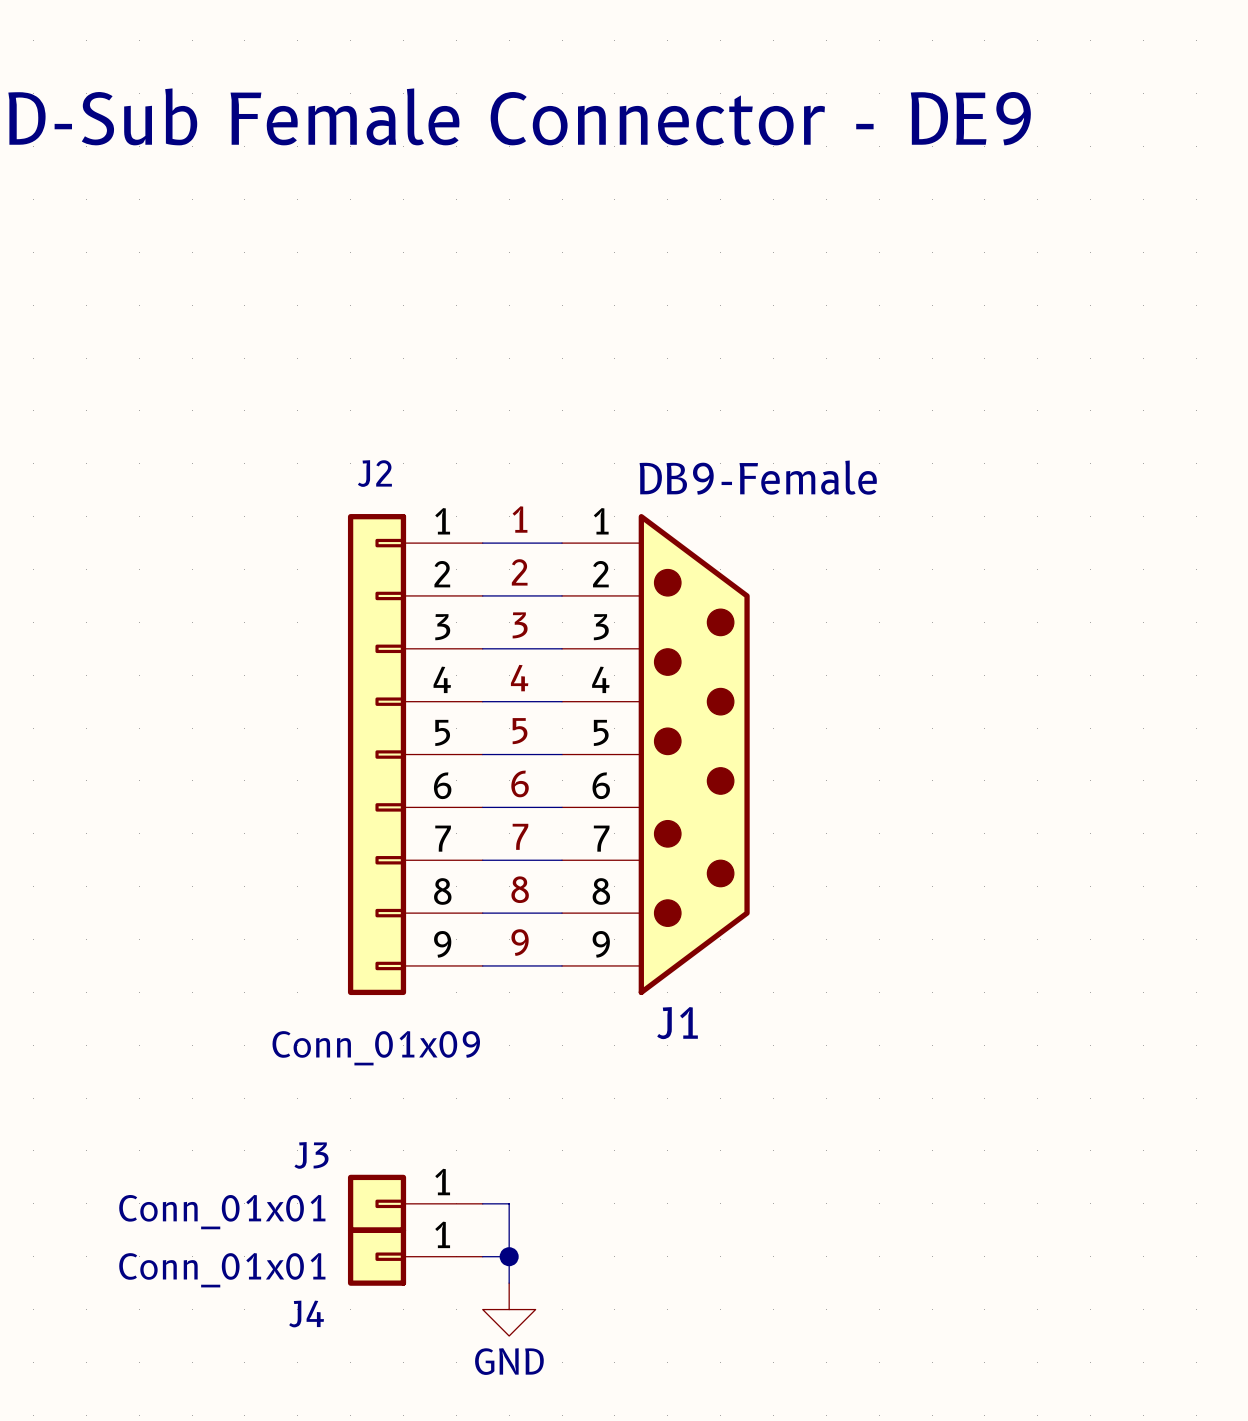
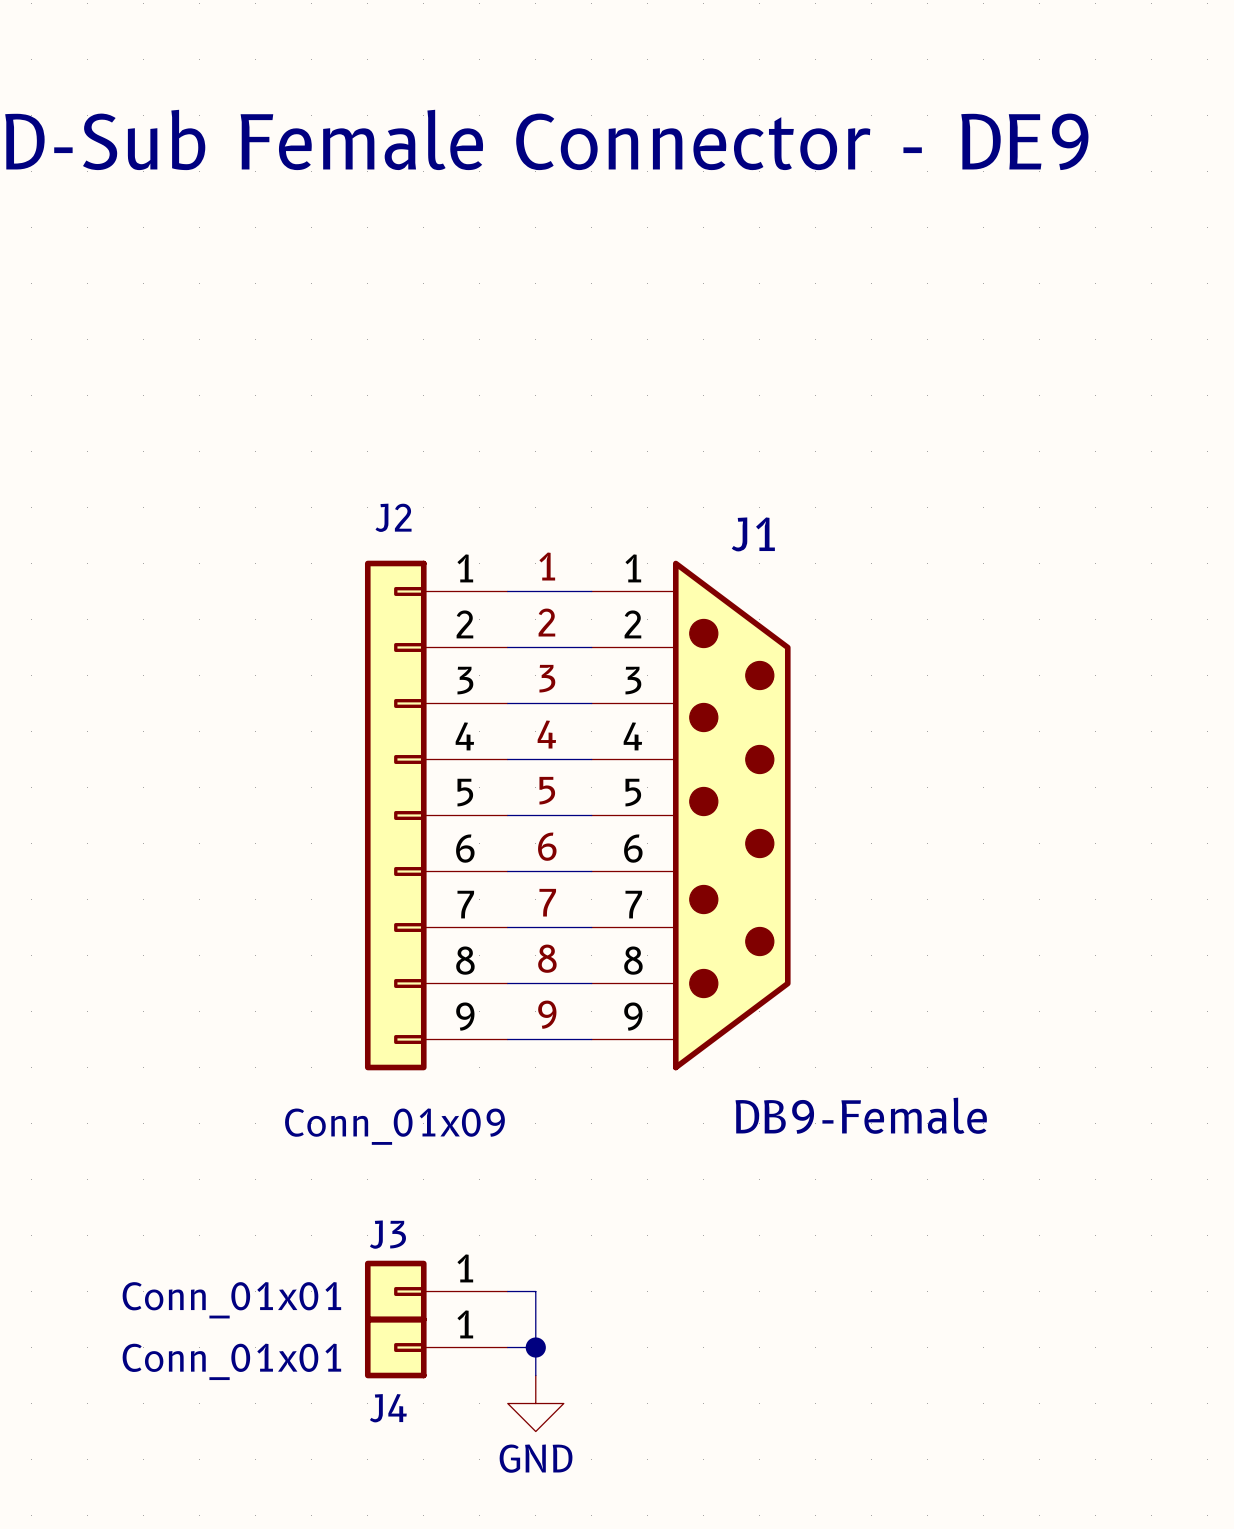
J1 value position: DB9-Female (758, 477) -> DB9-Female (861, 1115)
J1 name position: J1 (677, 1023) -> J1 (753, 534)
J3 name position: J3 (311, 1155) -> J3 (387, 1234)
J4 name position: J4 (306, 1314) -> J4 (388, 1408)

